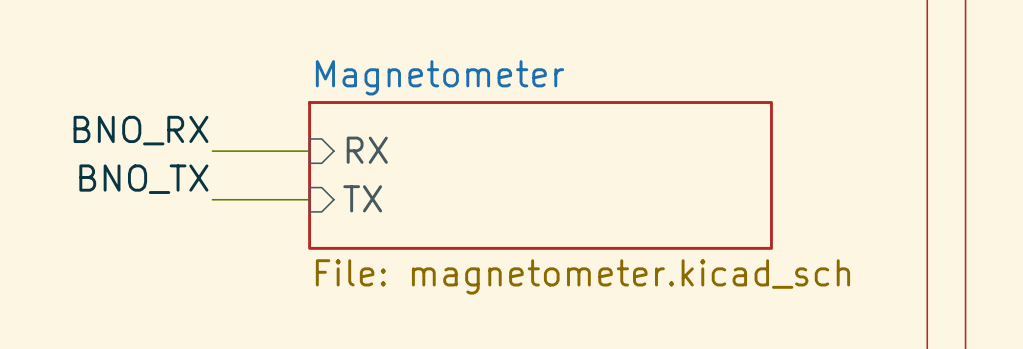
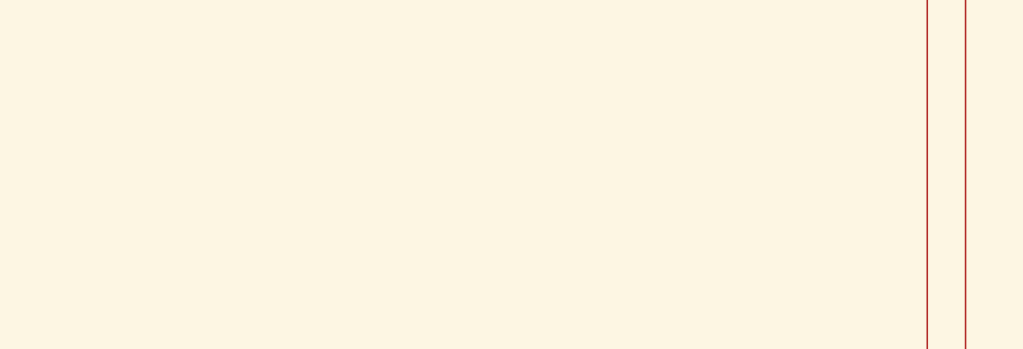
label: BNO_RX (141, 130) -> none
sheet pin: RX (367, 150) -> none
wire: (212, 151) (309, 151) -> none
sheet Magnetometer: File: magnetometer.kicad_sch (540, 175) -> none
label: BNO_TX (143, 179) -> none
sheet pin: TX (362, 198) -> none
wire: (212, 199) (309, 199) -> none

